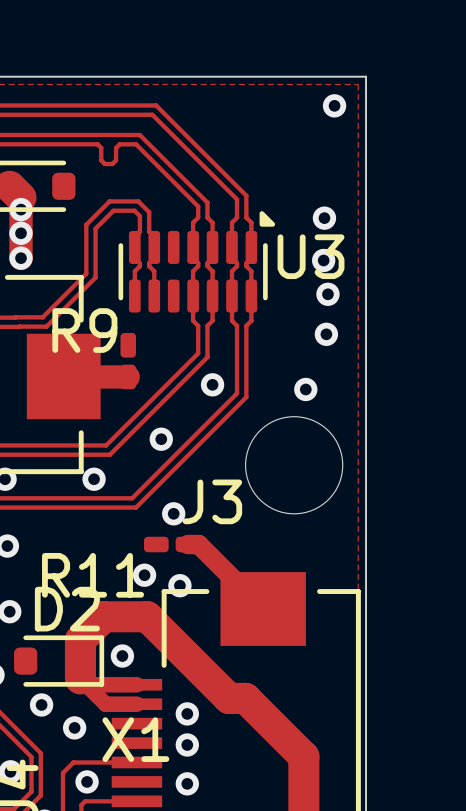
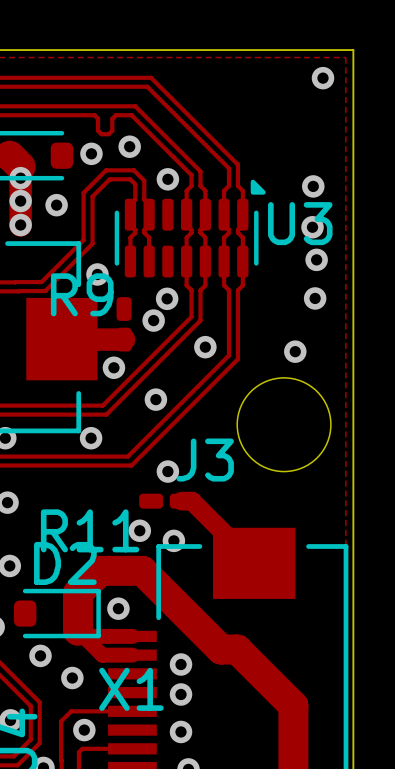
via: none -> (129, 146)
via: none -> (91, 153)
via: none -> (167, 179)
via: none -> (56, 205)
via: none -> (97, 274)
via: none -> (167, 298)
via: none -> (153, 320)
via: none -> (113, 367)

